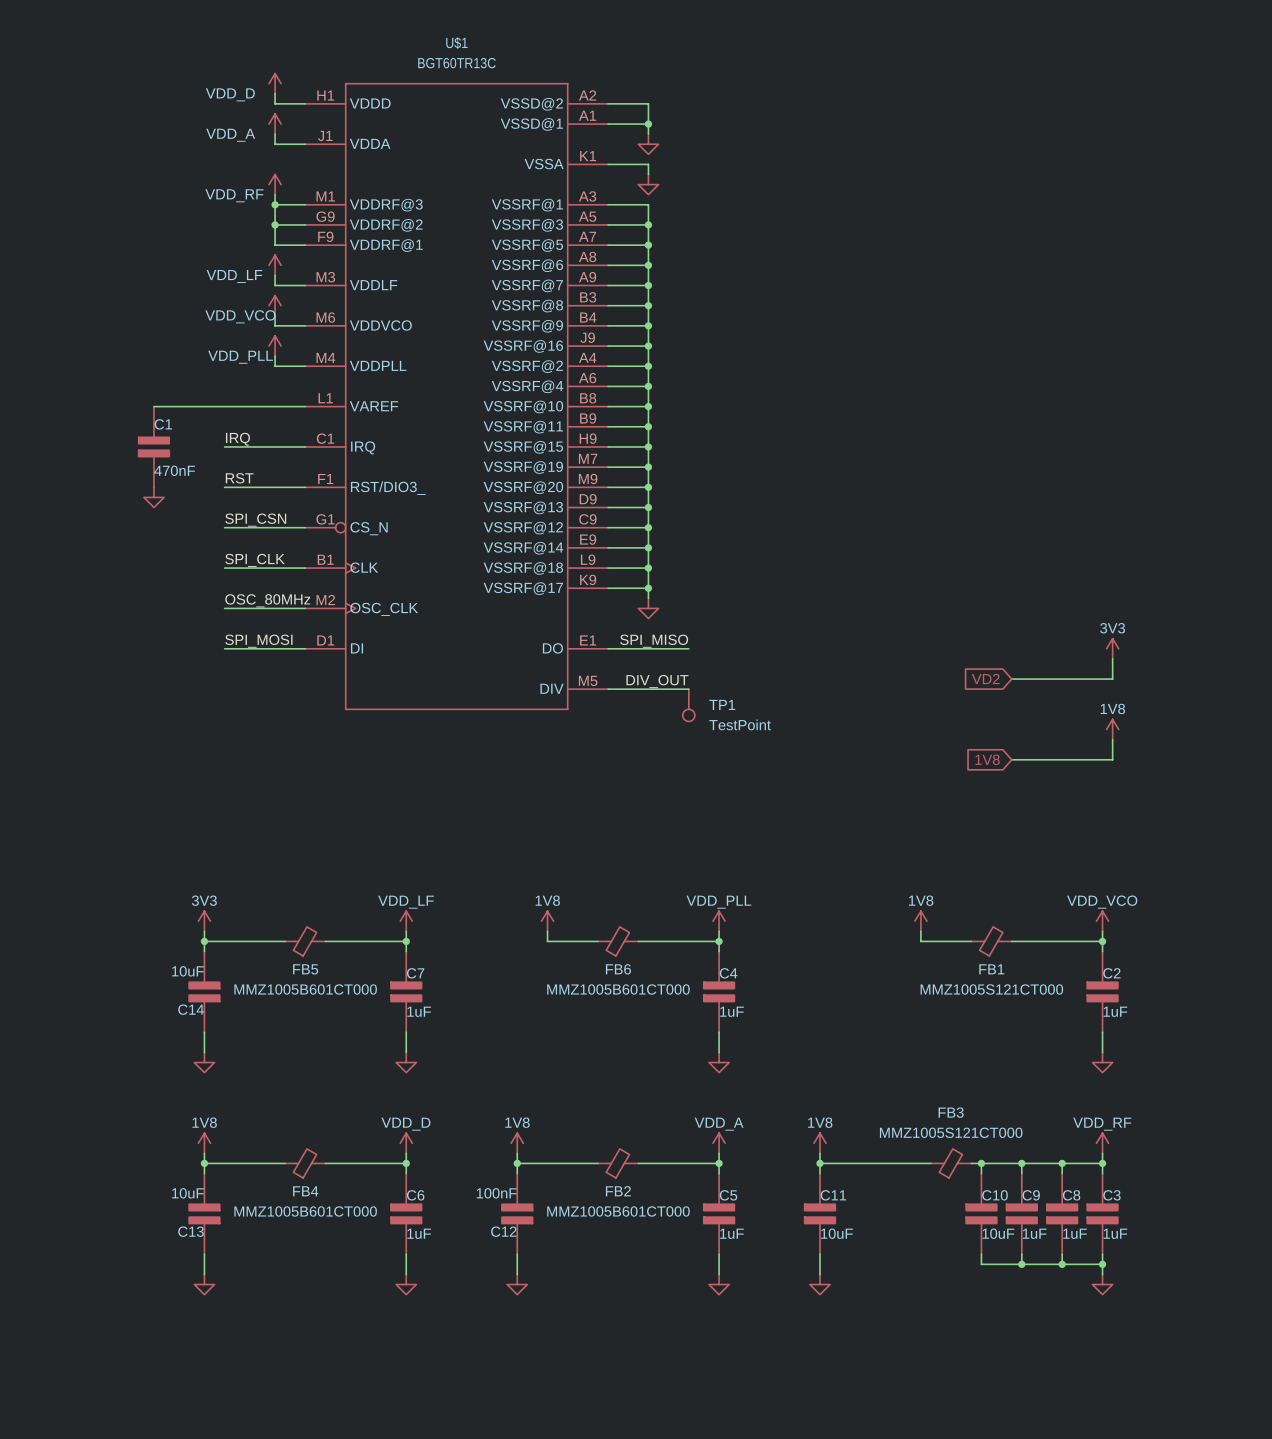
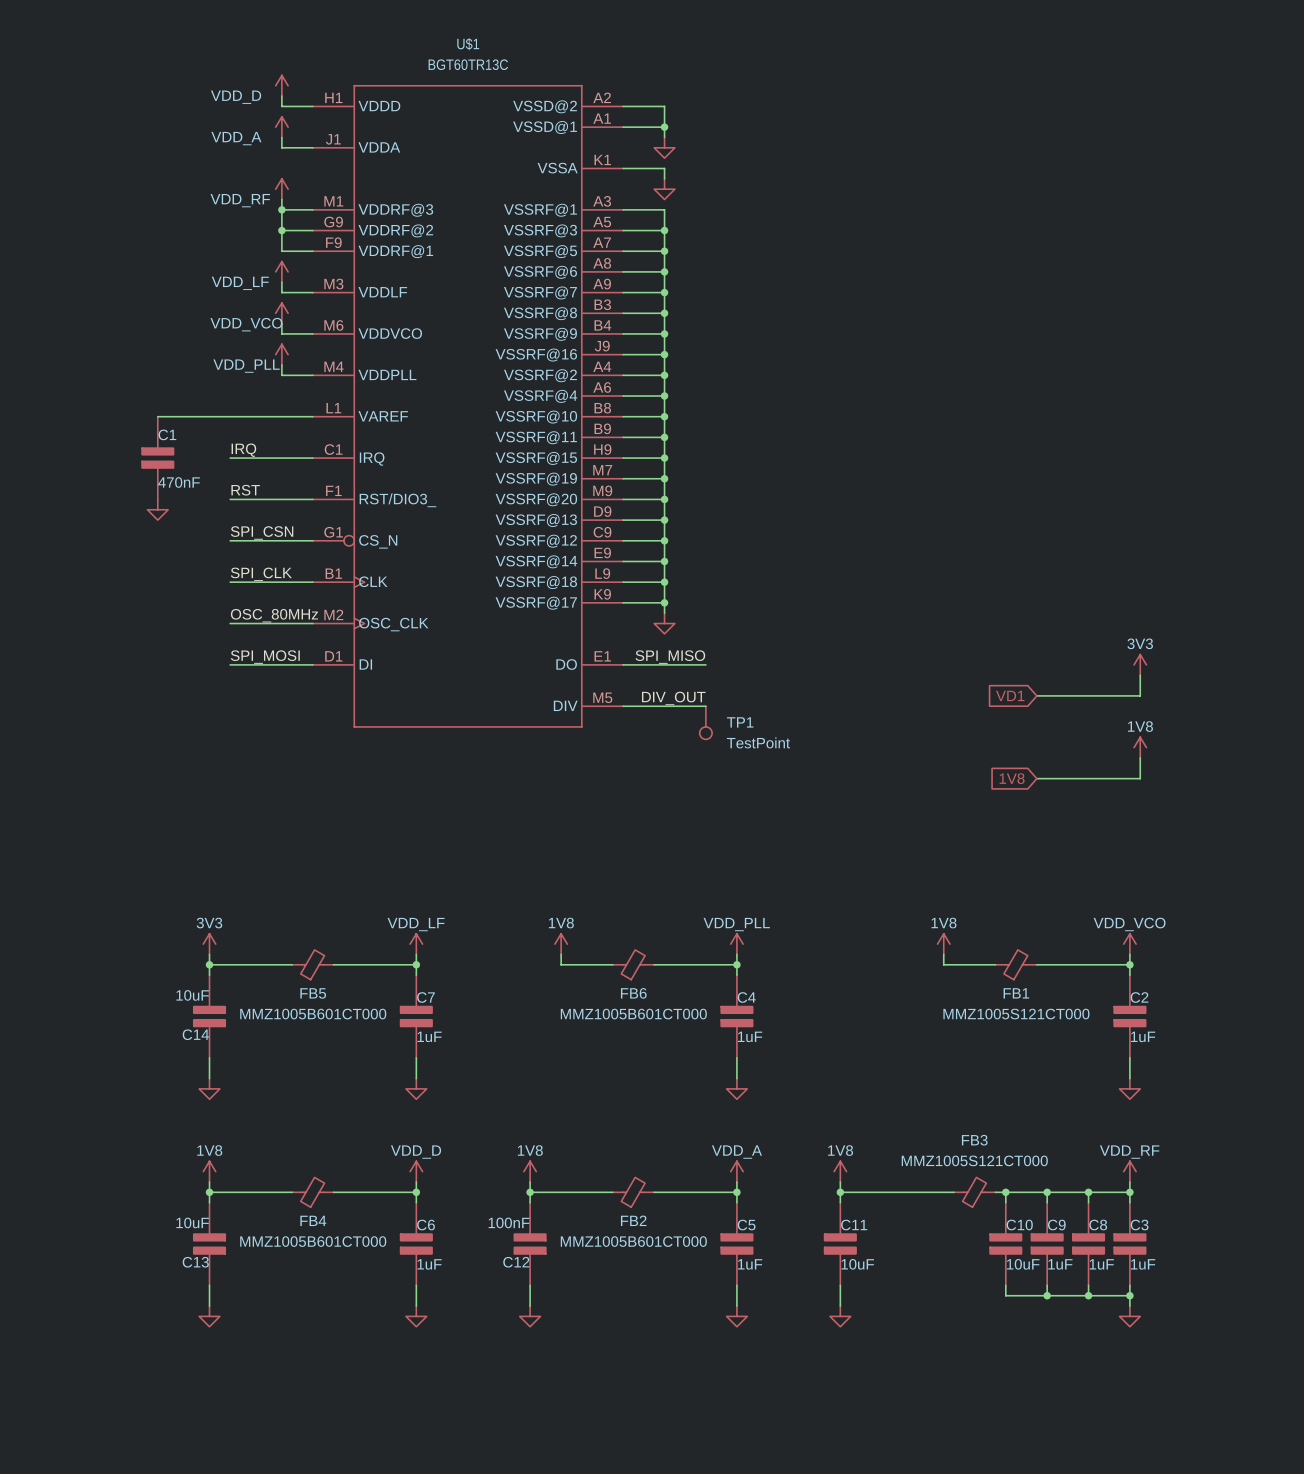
global label: VD2 (985, 678) -> VD1 (1010, 695)

